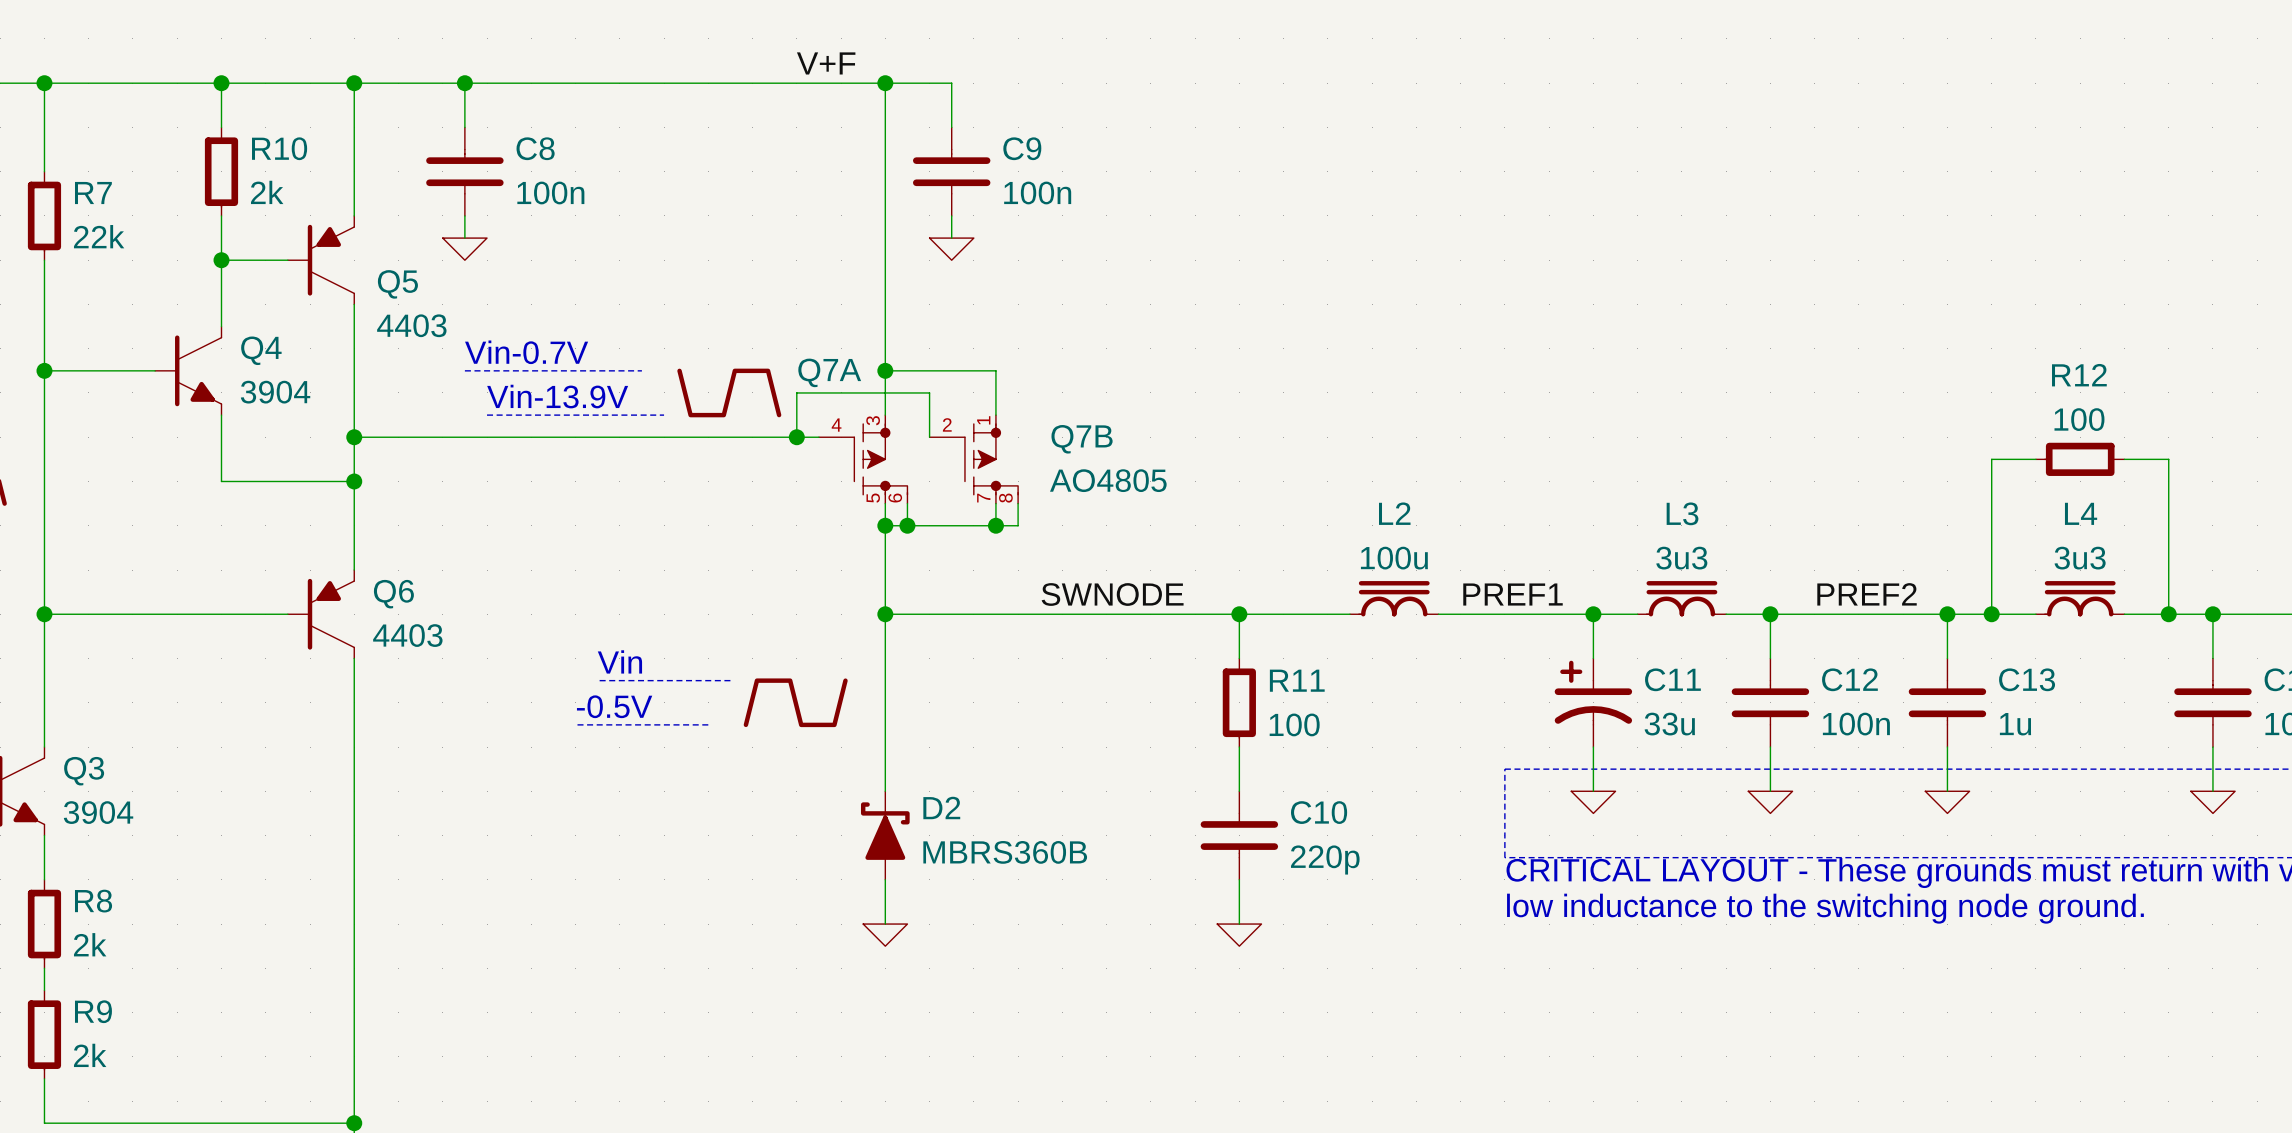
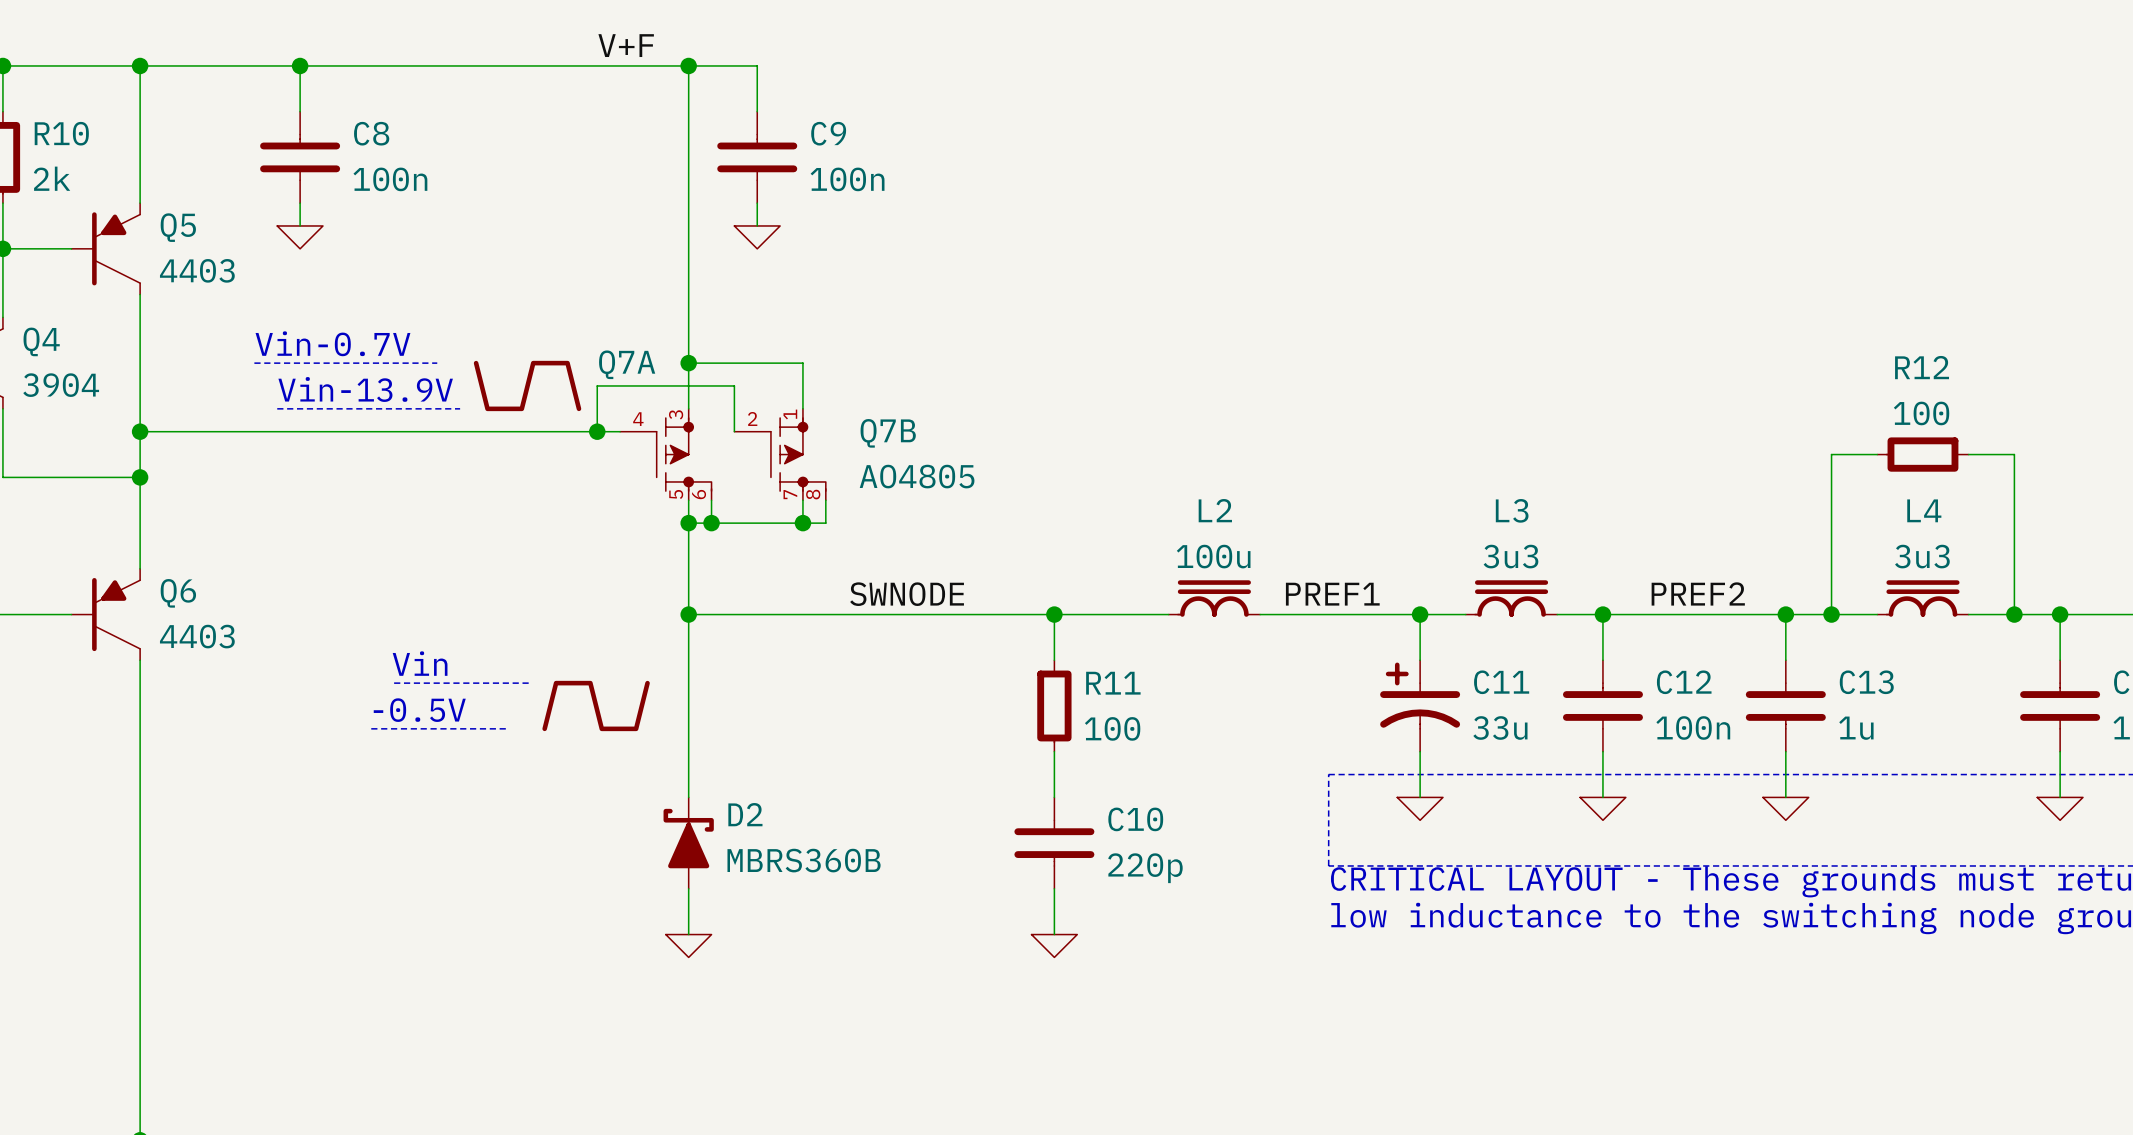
wire: (464, 83) (464, 127) -> (300, 65) (300, 111)
junction position: (464, 83) -> (300, 65)
C8 position: (464, 171) -> (300, 157)
wire: (464, 215) (464, 238) -> (300, 203) (300, 225)
power symbol position: (464, 249) -> (300, 237)
Q5 name position: Q5 (397, 284) -> Q5 (178, 227)
Q5 value position: 4403 (411, 325) -> 4403 (197, 270)

